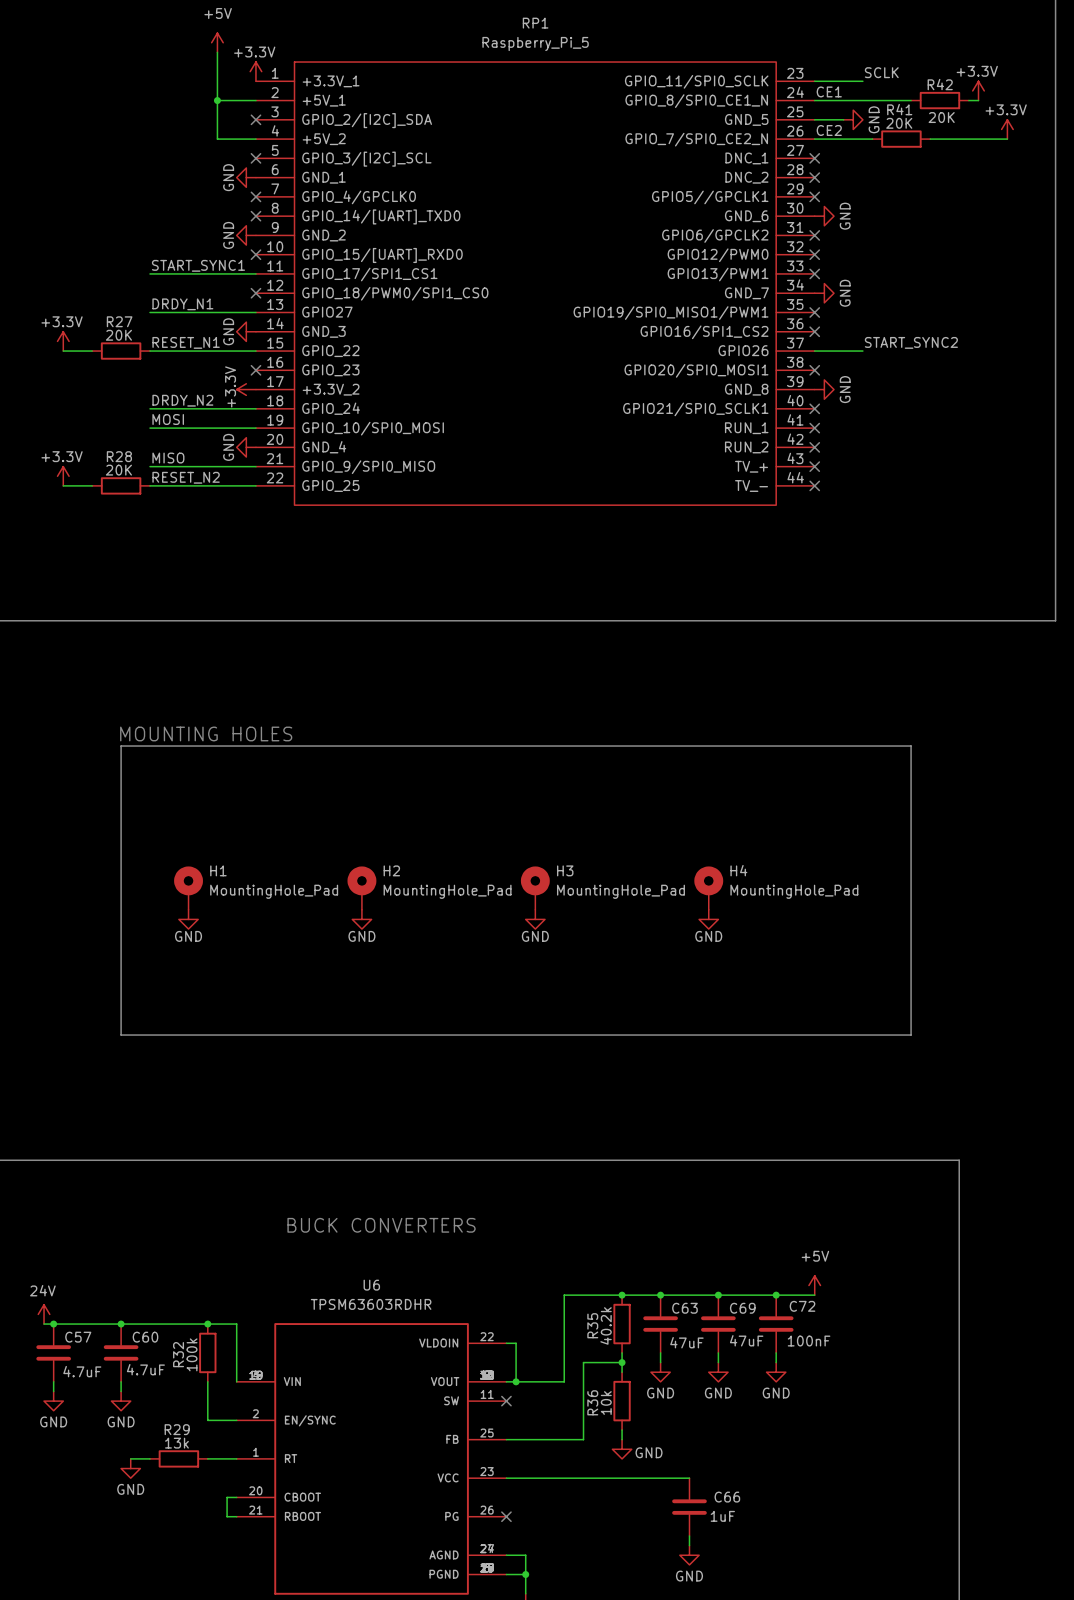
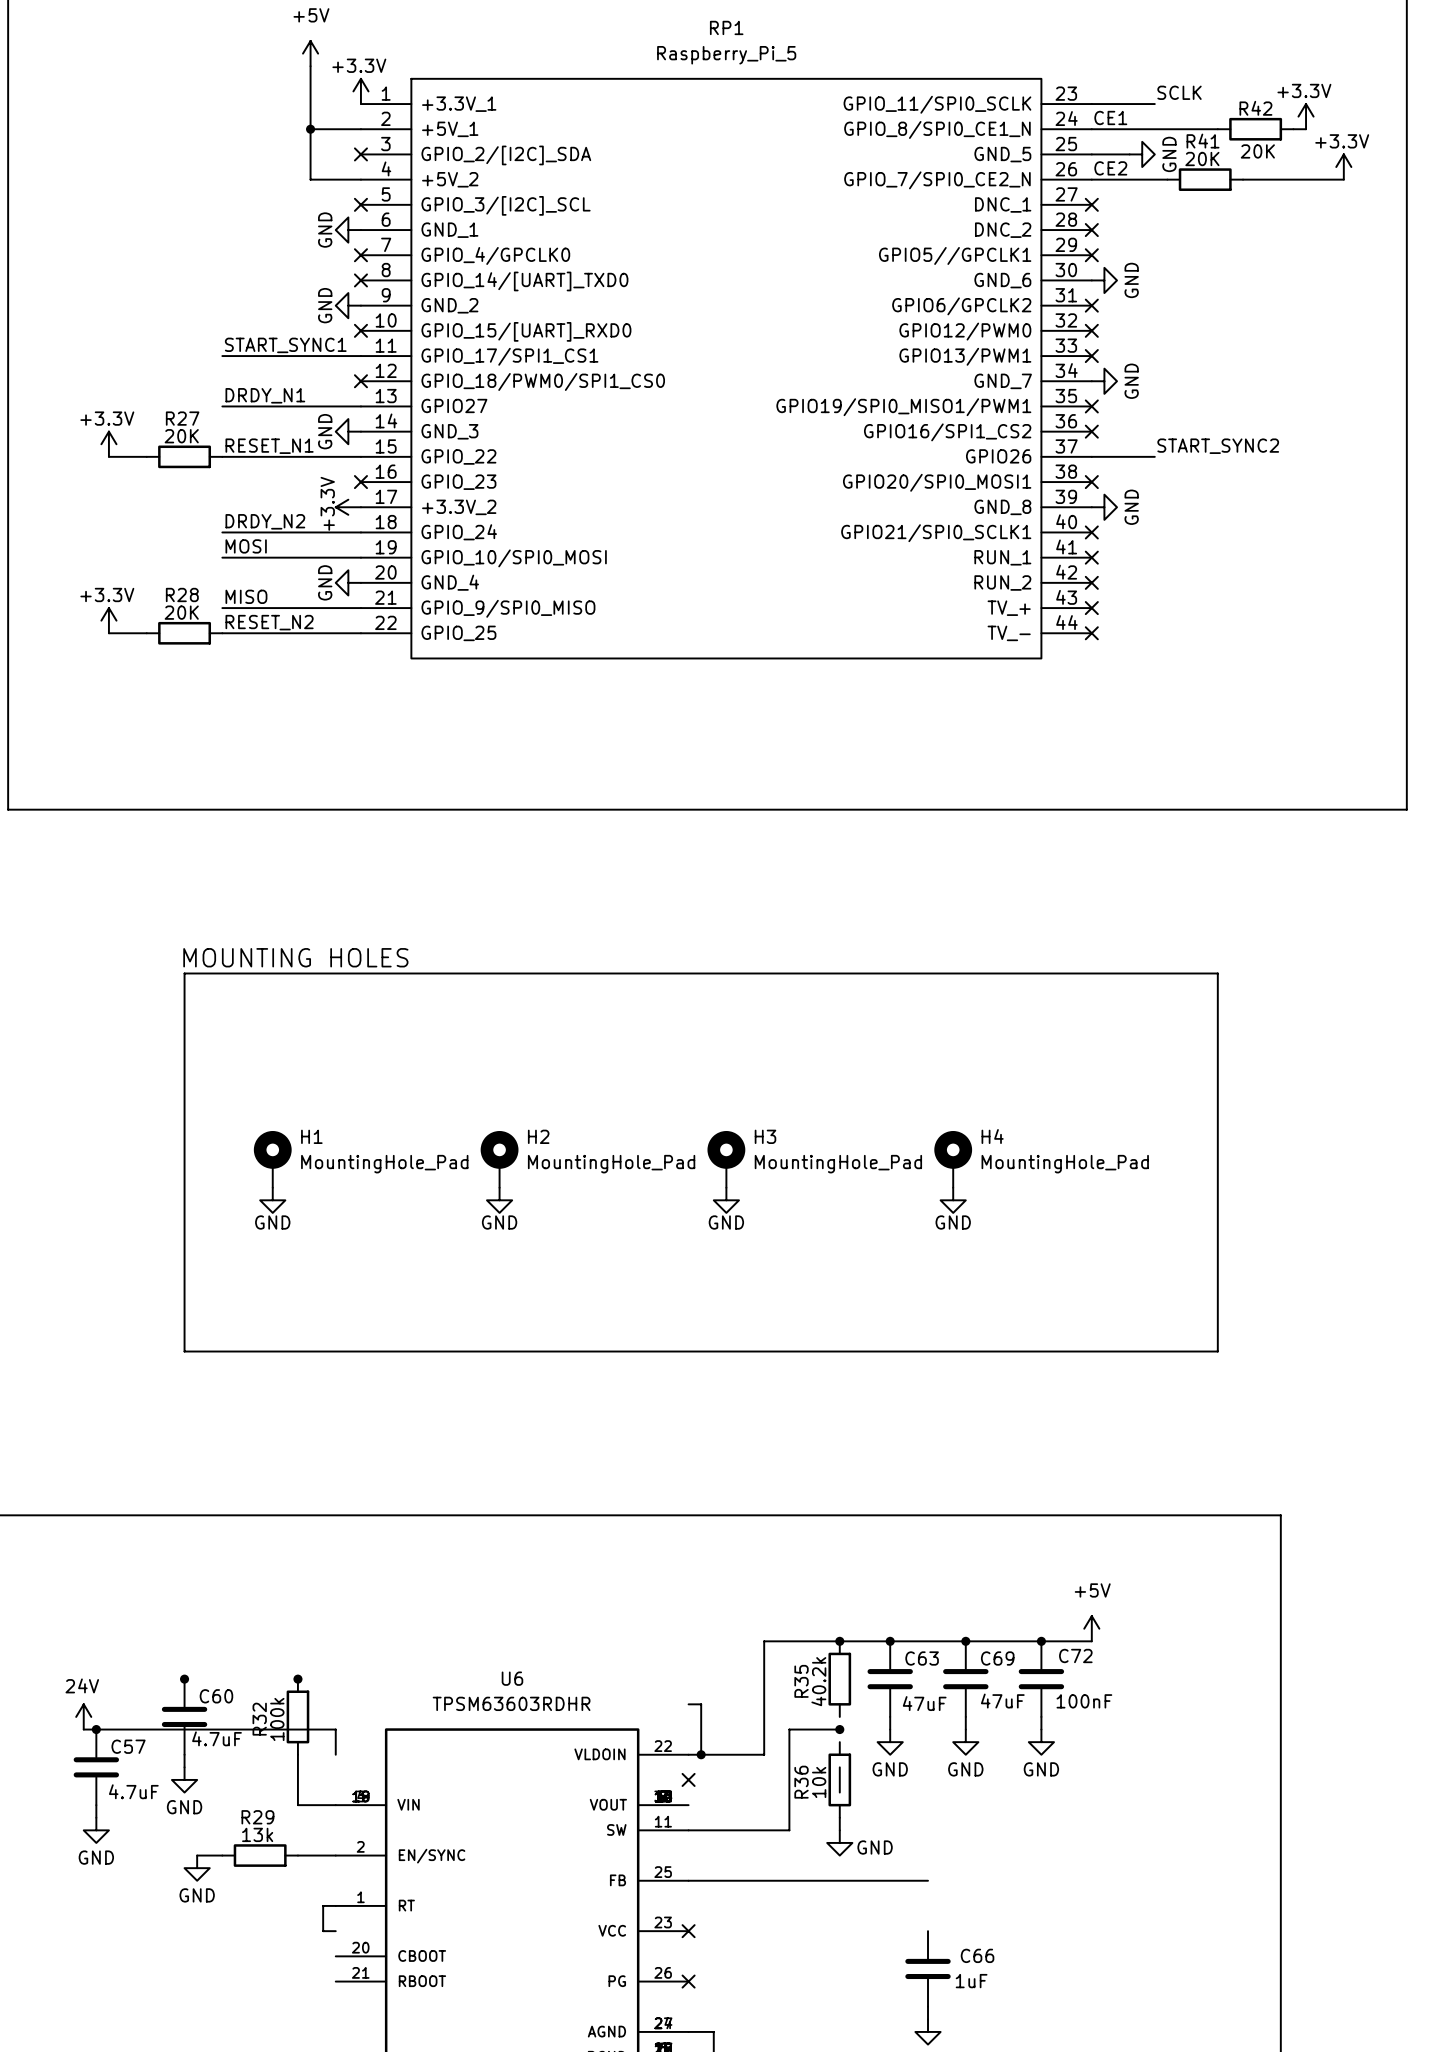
text: BUCK CONVERTERS (381, 1225) -> none
junction: none -> (839, 1641)
junction: none -> (890, 1641)
junction: none -> (965, 1641)
junction: none -> (1041, 1641)
power symbol position: +5V (814, 1285) -> +5V (1091, 1628)
wire: (564, 1295) (814, 1295) -> (764, 1691) (764, 1641) (1091, 1641)
junction: (622, 1295) -> none
junction: (660, 1295) -> none
junction: (718, 1295) -> none
junction: (776, 1295) -> none
junction position: (121, 1324) -> (184, 1679)
junction position: (207, 1324) -> (297, 1679)
junction: none -> (839, 1729)
R35 position: (622, 1324) -> (839, 1679)
C63 position: (660, 1324) -> (890, 1679)
C69 position: (718, 1324) -> (965, 1679)
C72 position: (776, 1324) -> (1041, 1679)
power symbol: none -> GND (890, 1742)
power symbol: none -> GND (965, 1742)
power symbol: none -> GND (1041, 1742)
wire: (236, 1343) (236, 1381) -> (297, 1754) (297, 1805) (335, 1805)
wire: (516, 1343) (516, 1381) -> none
wire: (564, 1343) (564, 1381) (506, 1381) -> (764, 1754) (701, 1754) (701, 1704) (688, 1704)
C60 position: (121, 1352) -> (184, 1716)
R32 position: (207, 1352) -> (297, 1716)
power symbol: none -> GND (184, 1779)
no-connect mark: none -> (688, 1779)
wire: (583, 1362) (622, 1362) -> (789, 1779) (789, 1729) (839, 1729)
junction: (622, 1362) -> none
power symbol: GND (660, 1372) -> none
power symbol: GND (718, 1372) -> none
power symbol: GND (776, 1372) -> none
wire: (207, 1381) (207, 1420) -> none
junction position: (516, 1381) -> (701, 1754)
power symbol: GND (121, 1401) -> none
no-connect mark: (506, 1401) -> none
wire: (583, 1401) (583, 1439) -> (789, 1830) (688, 1830)
R36 position: (622, 1401) -> (839, 1779)
power symbol: none -> GND (839, 1842)
power symbol: none -> GND (197, 1868)
wire: (622, 1430) (622, 1439) -> (839, 1817) (839, 1830)
wire: none -> (789, 1880) (928, 1880)
power symbol: GND (622, 1449) -> none
wire: (130, 1458) (149, 1458) -> (197, 1855) (222, 1855)
R29 position: (178, 1458) -> (260, 1855)
wire: (207, 1458) (227, 1458) -> (335, 1931) (323, 1931) (323, 1905)
power symbol: GND (130, 1468) -> none
wire: (506, 1478) (689, 1478) -> none
no-connect mark: none -> (688, 1931)
wire: (236, 1497) (227, 1497) (227, 1516) (236, 1516) -> none

